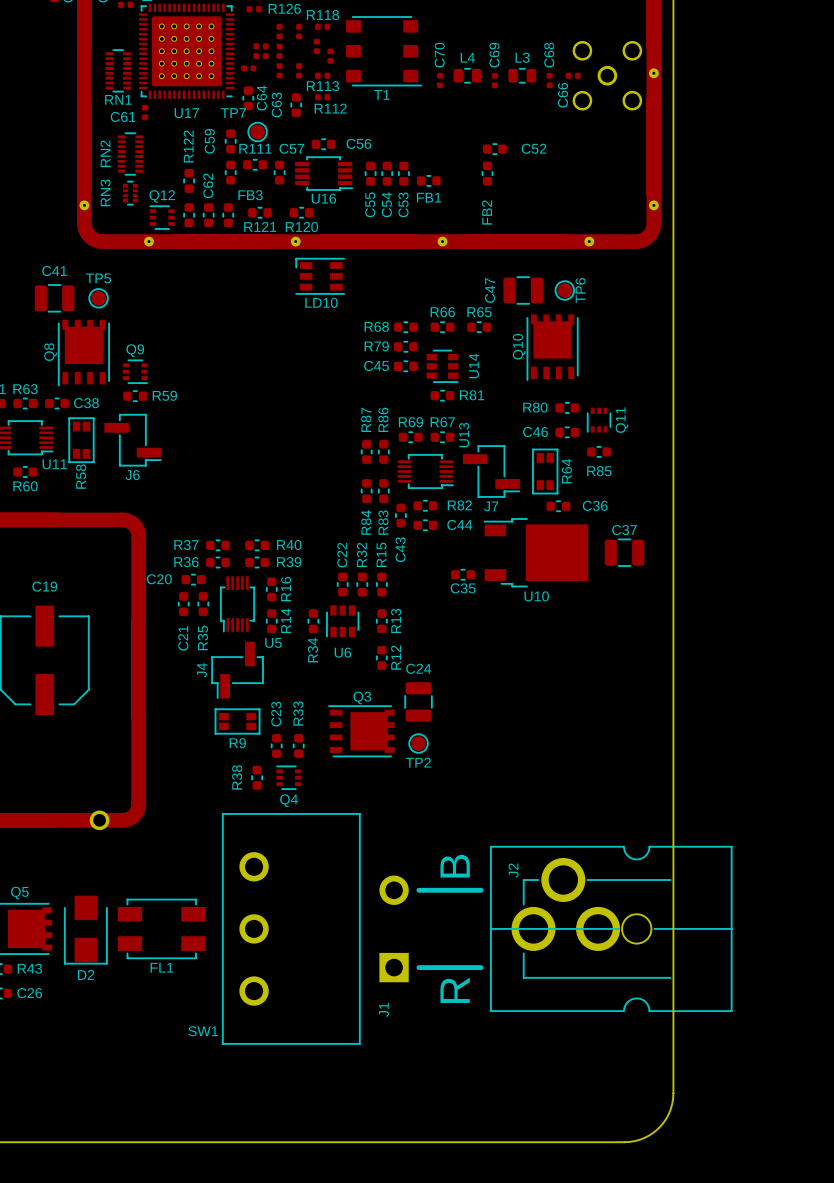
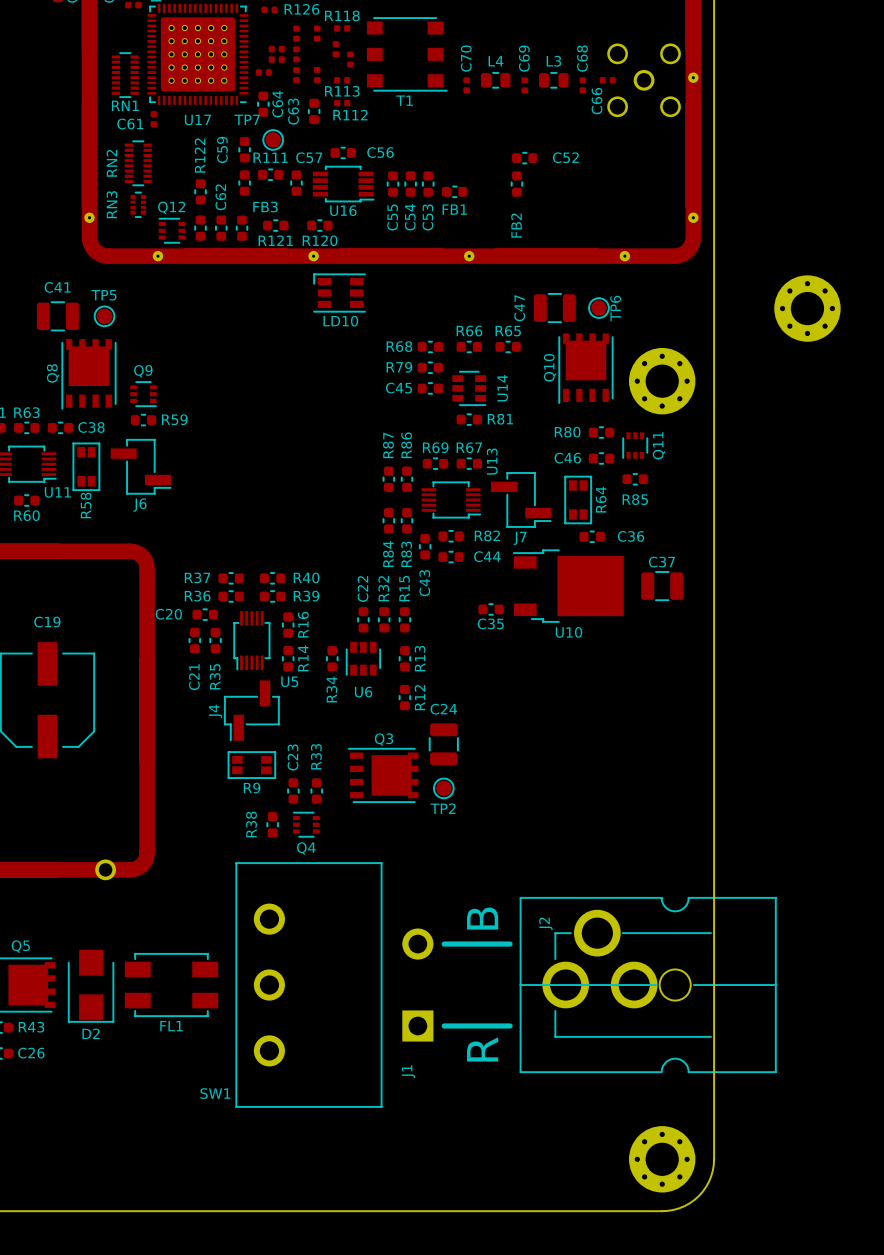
part: none -> (807, 308)
part: none -> (662, 381)
part: none -> (662, 1159)

